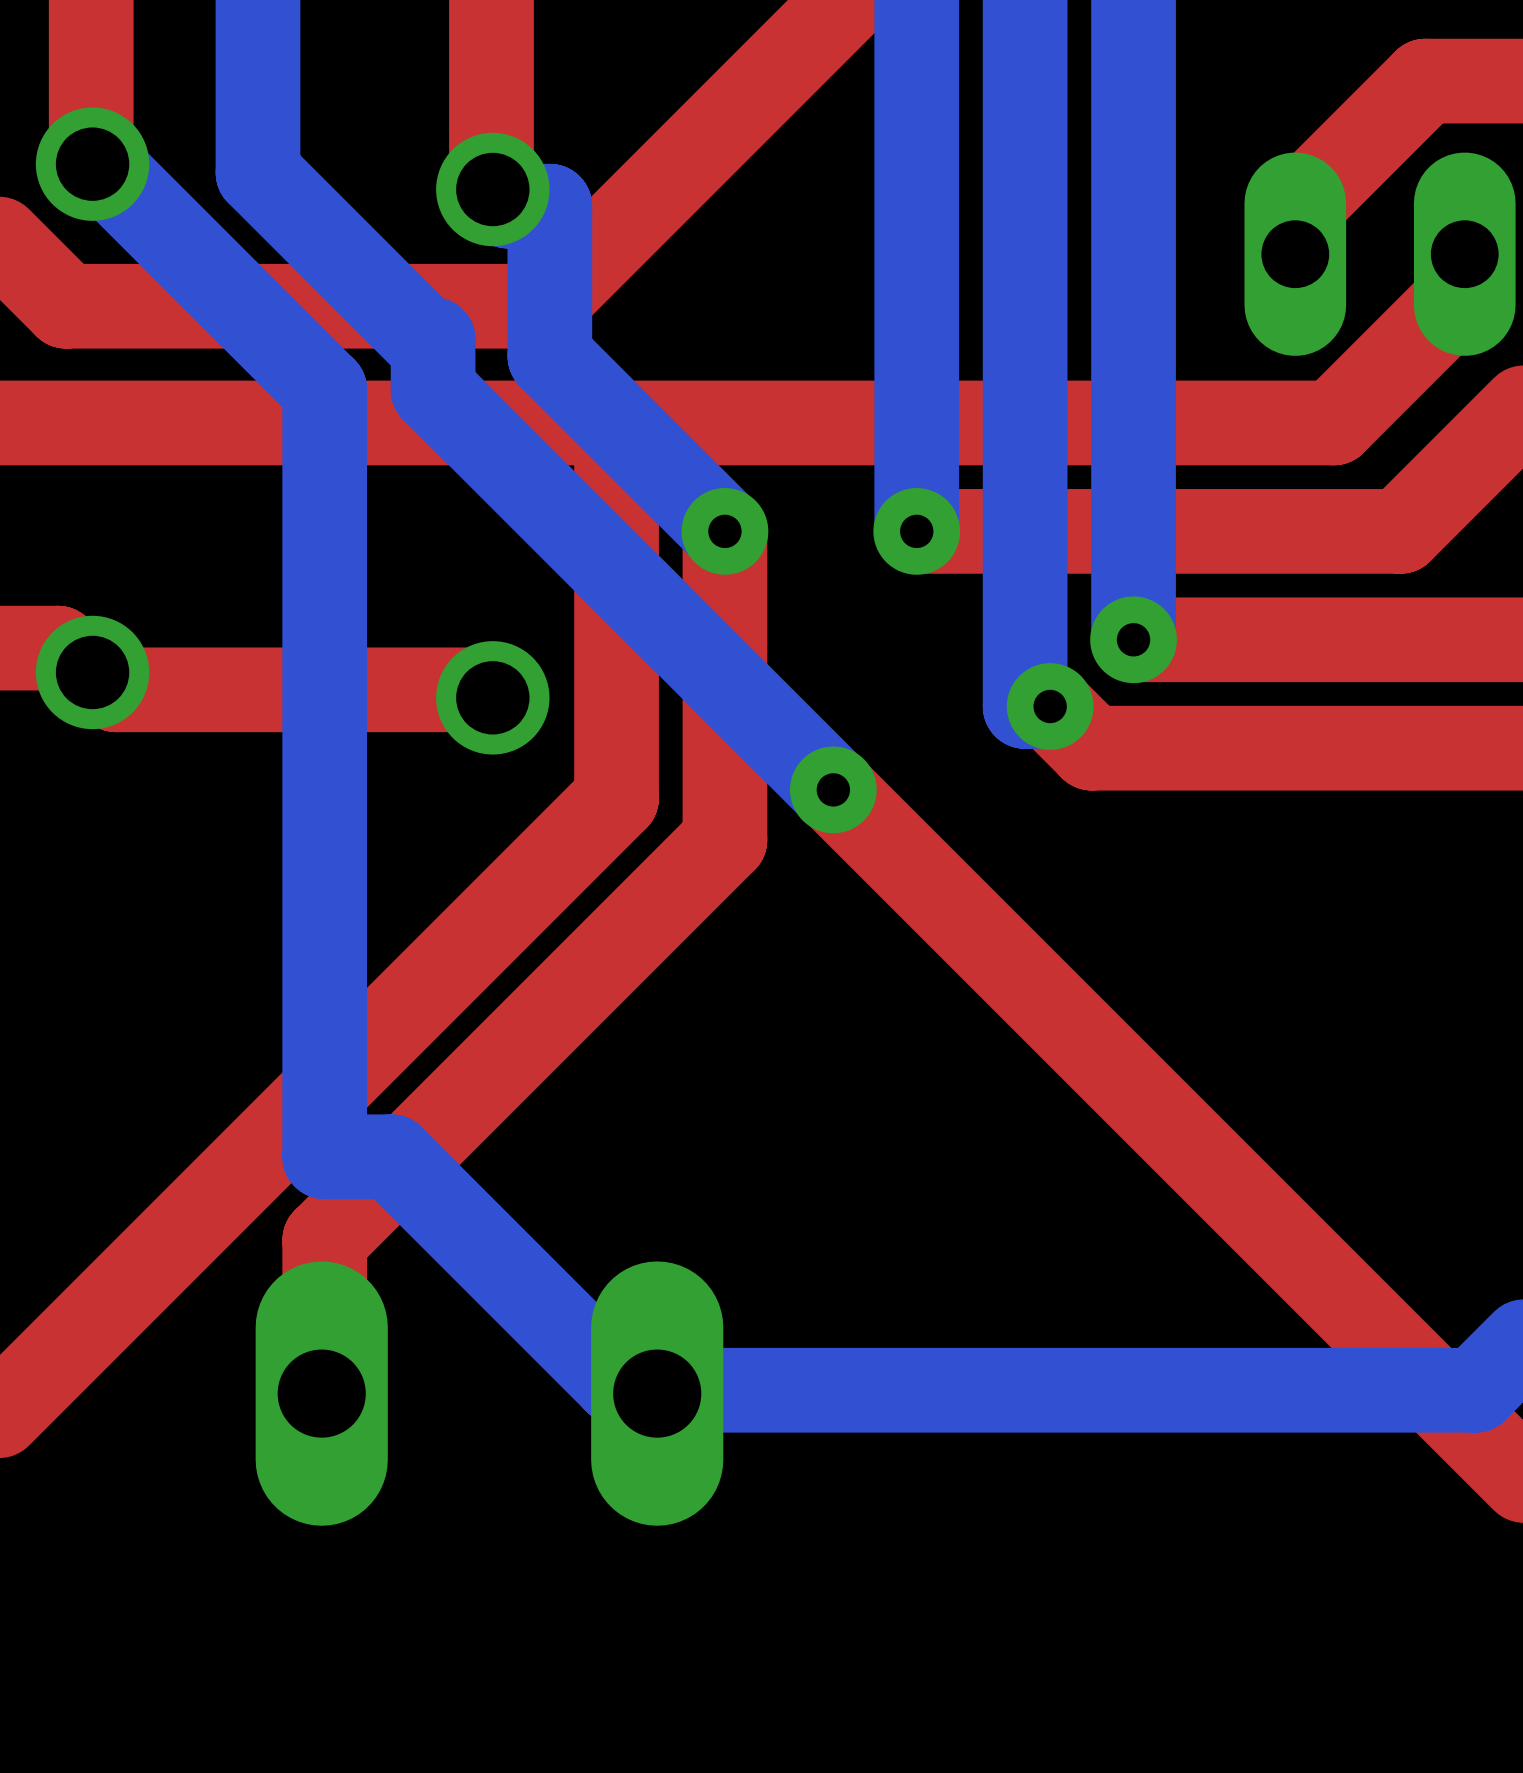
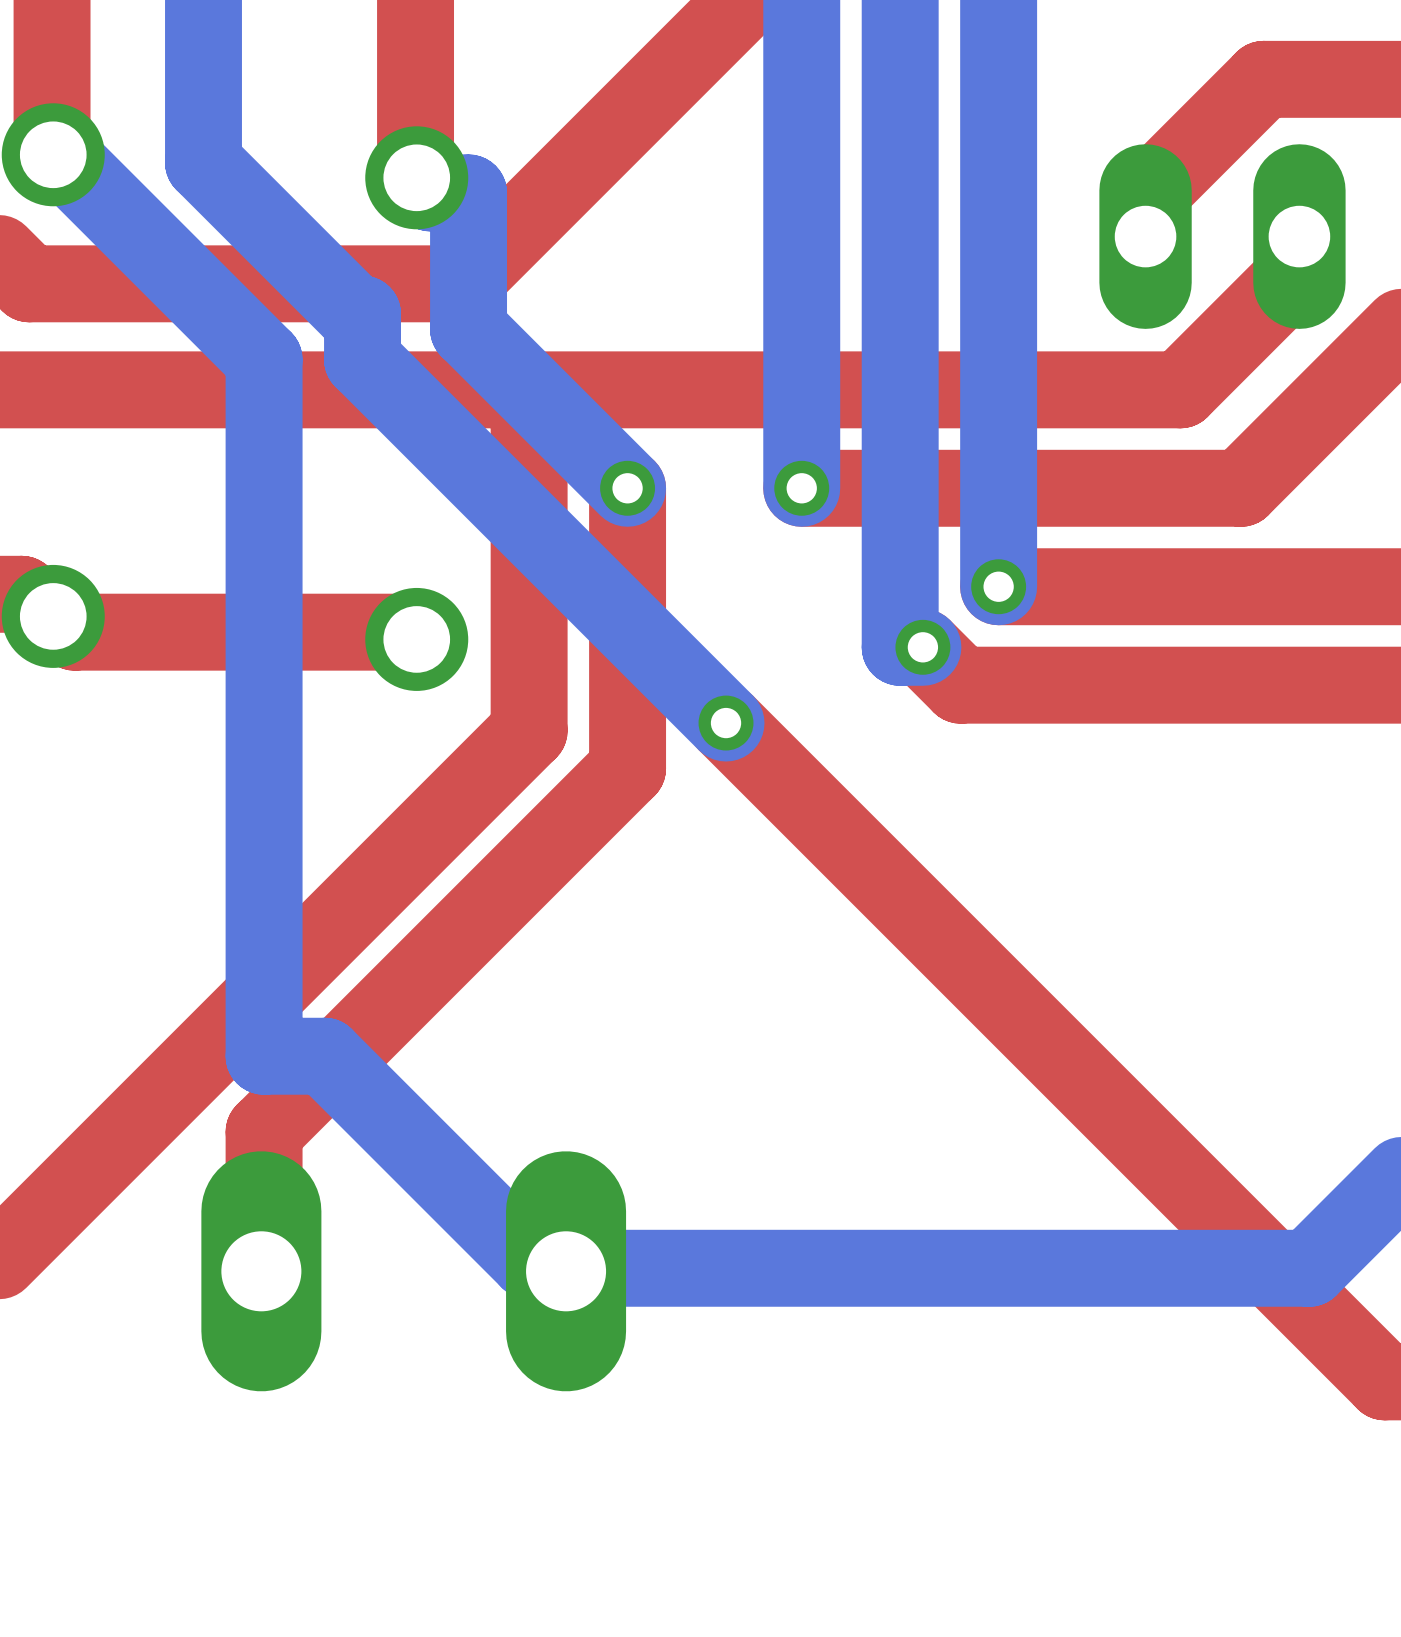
via size: [681, 488, 769, 575] -> [600, 460, 656, 516]
via size: [873, 488, 961, 575] -> [774, 460, 830, 516]
via size: [1090, 596, 1177, 684] -> [971, 559, 1027, 615]
via size: [1006, 663, 1094, 750] -> [895, 619, 951, 675]
via size: [789, 746, 877, 834] -> [698, 695, 754, 751]

